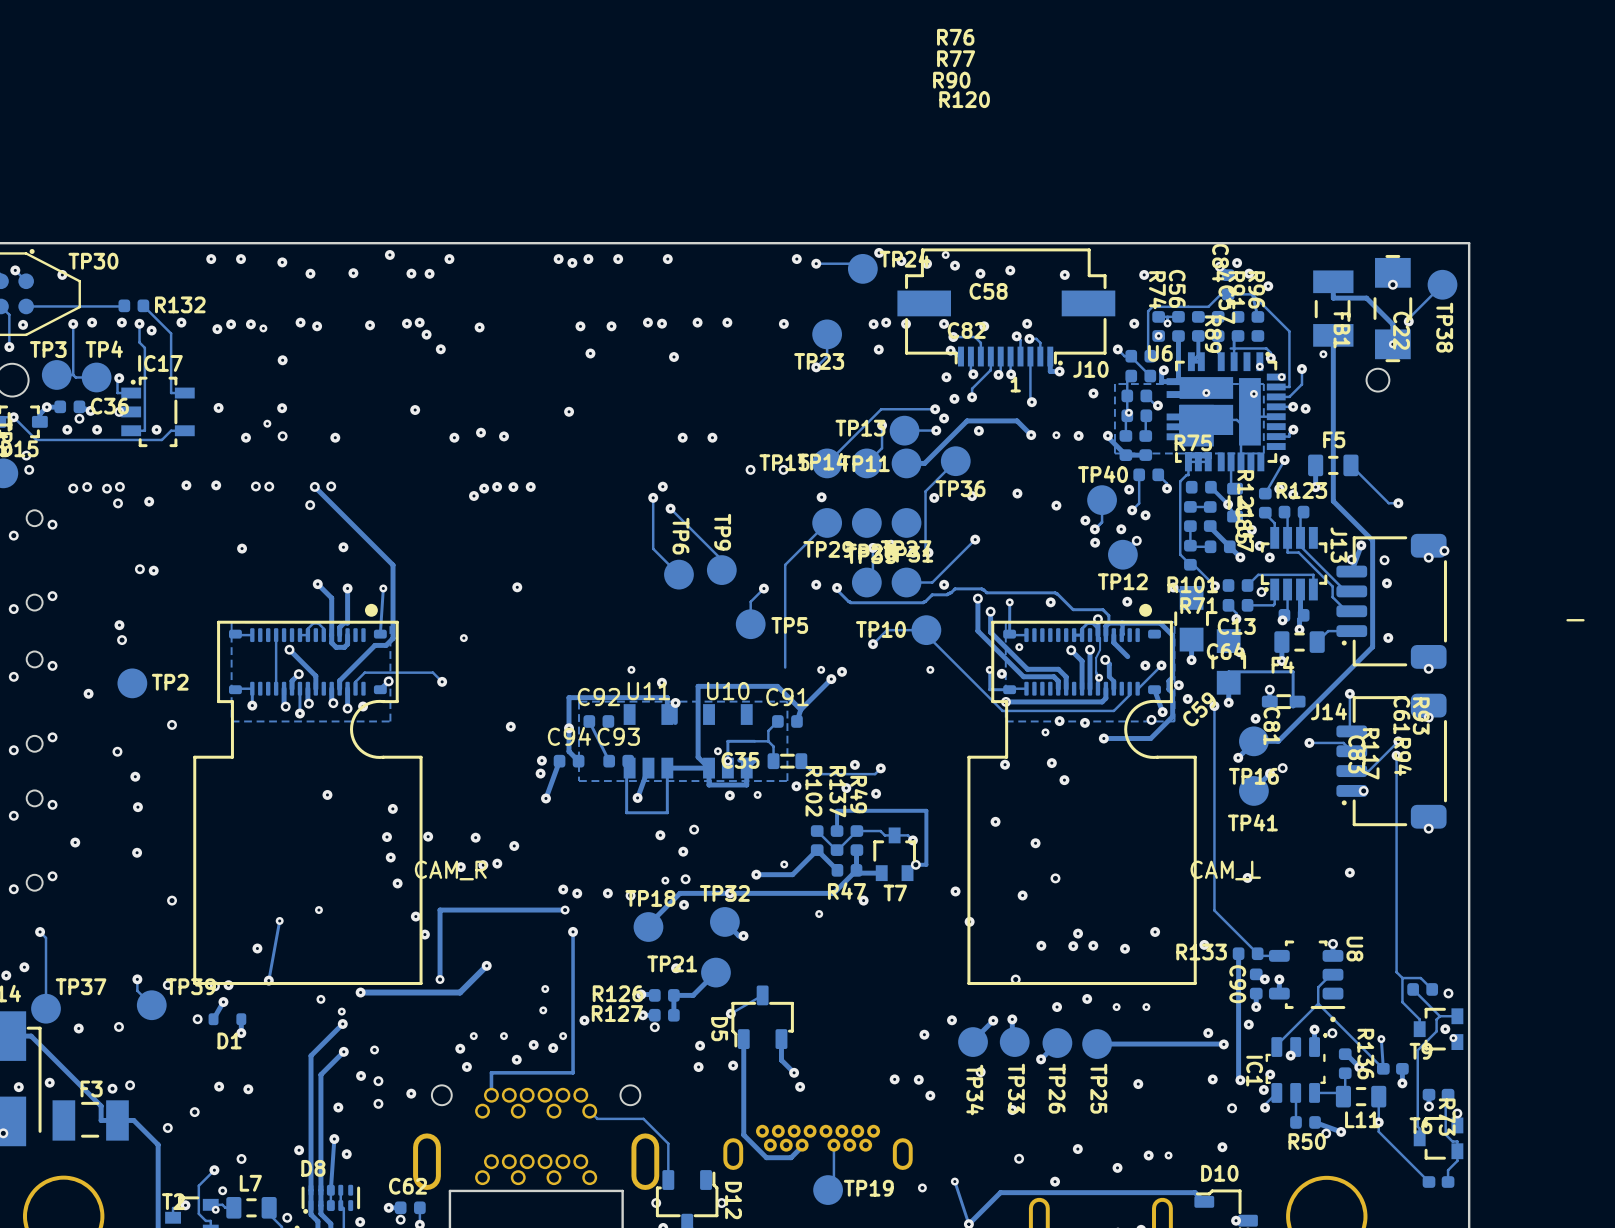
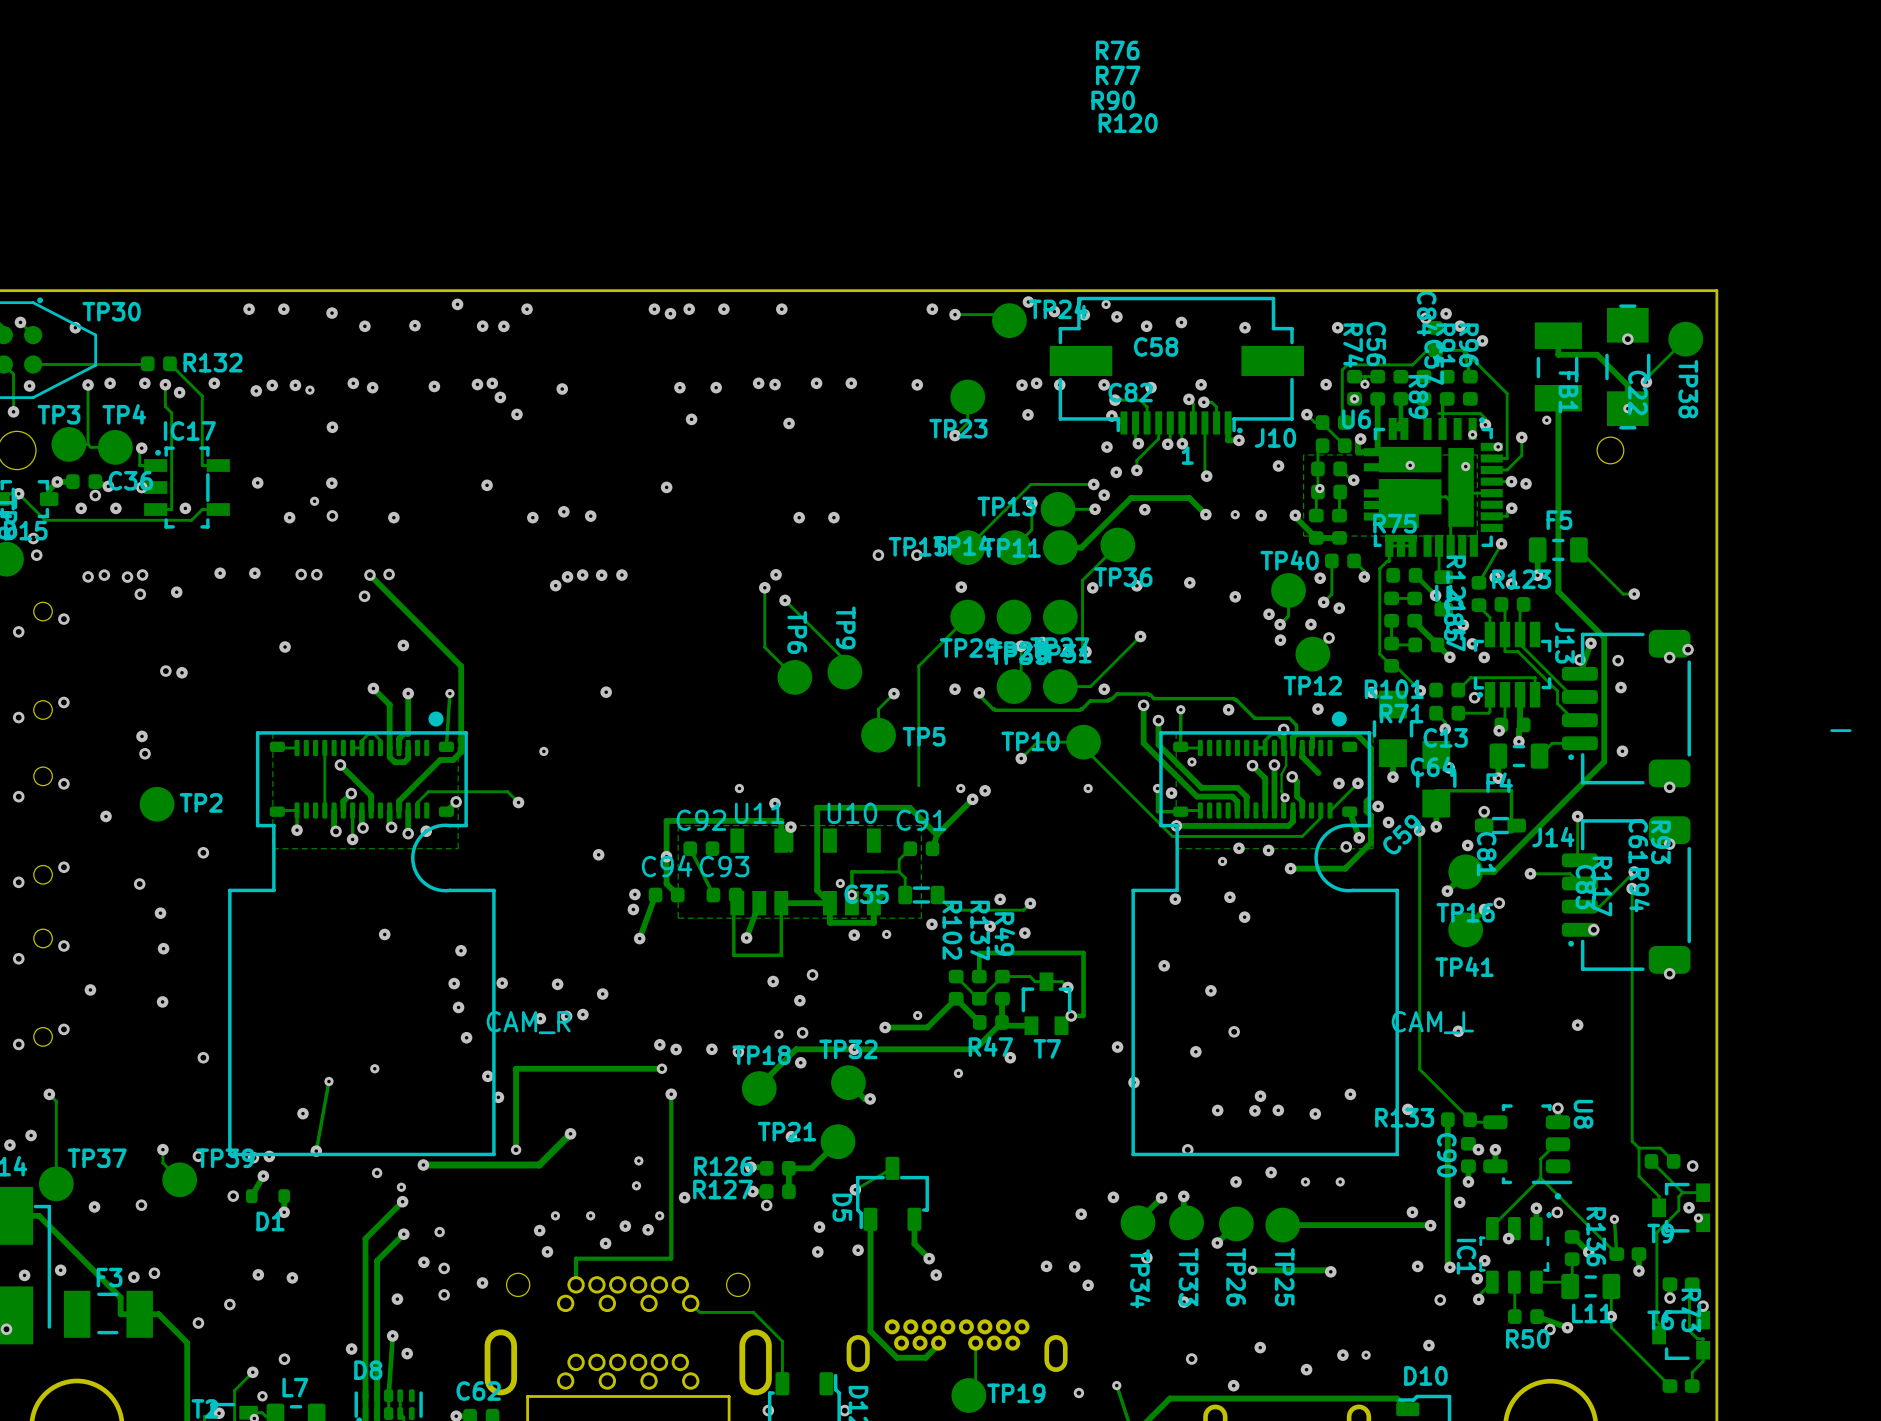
track: none -> (1252, 1270) (1330, 1270) (1330, 1271)
via: none -> (1252, 1270)

